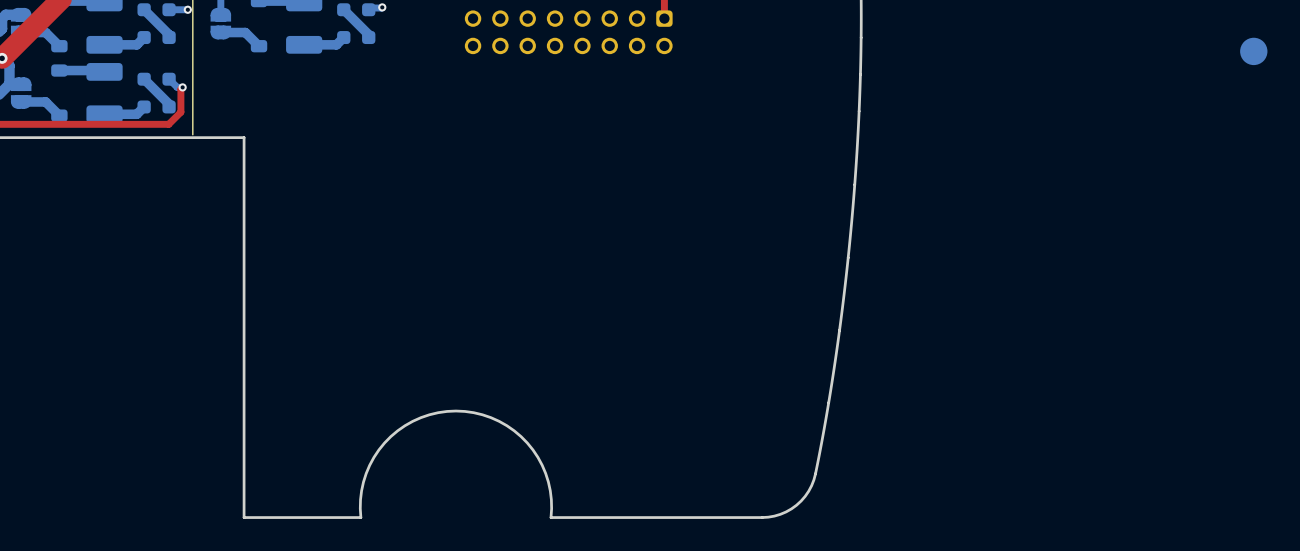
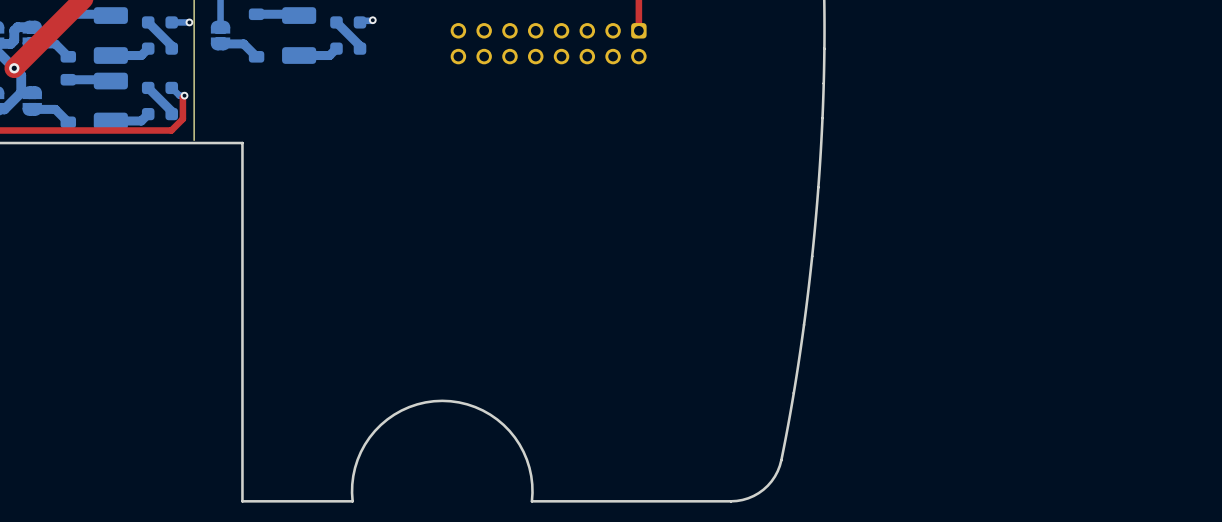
part: (1253, 51) -> none

